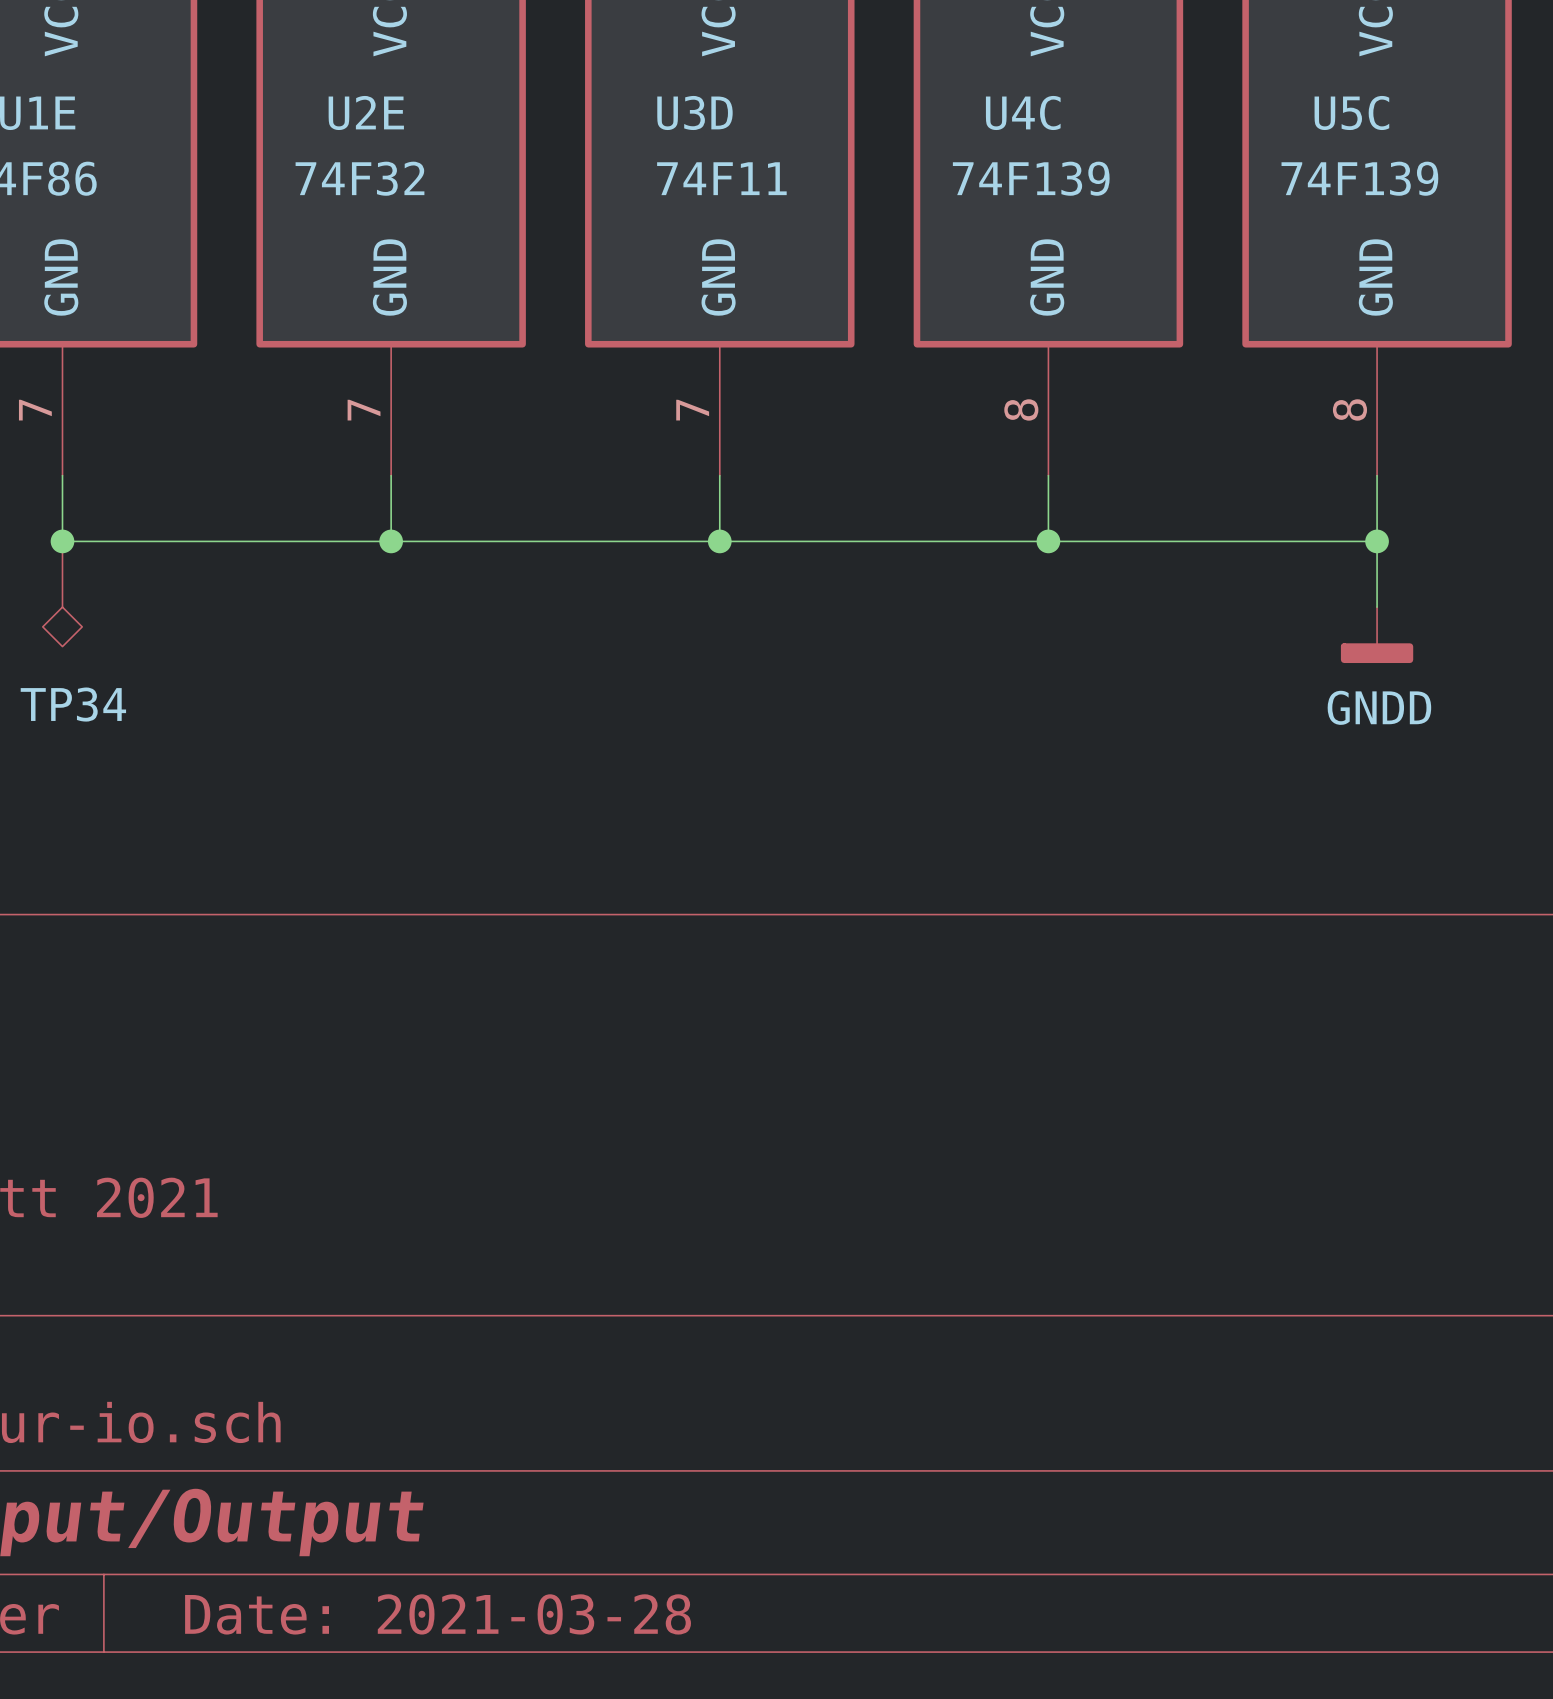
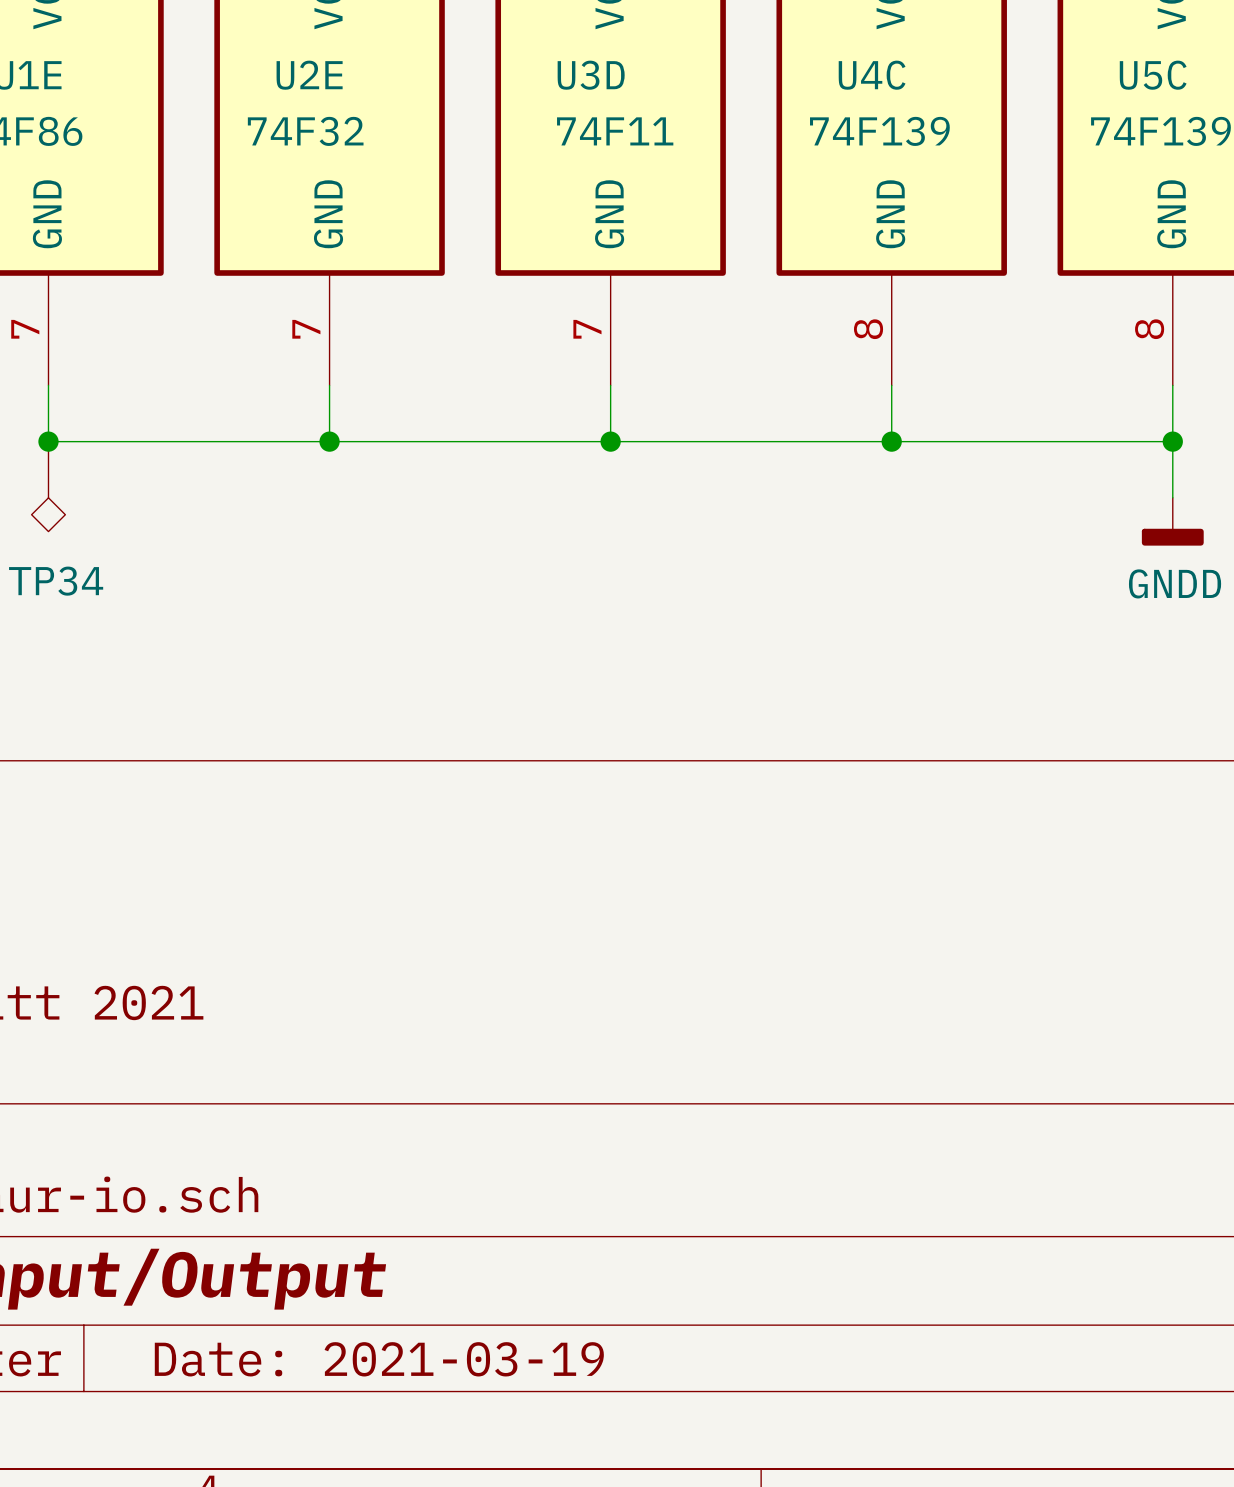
title block: Date: 2021-03-28 (438, 1614) -> Date: 2021-03-19 (379, 1359)

